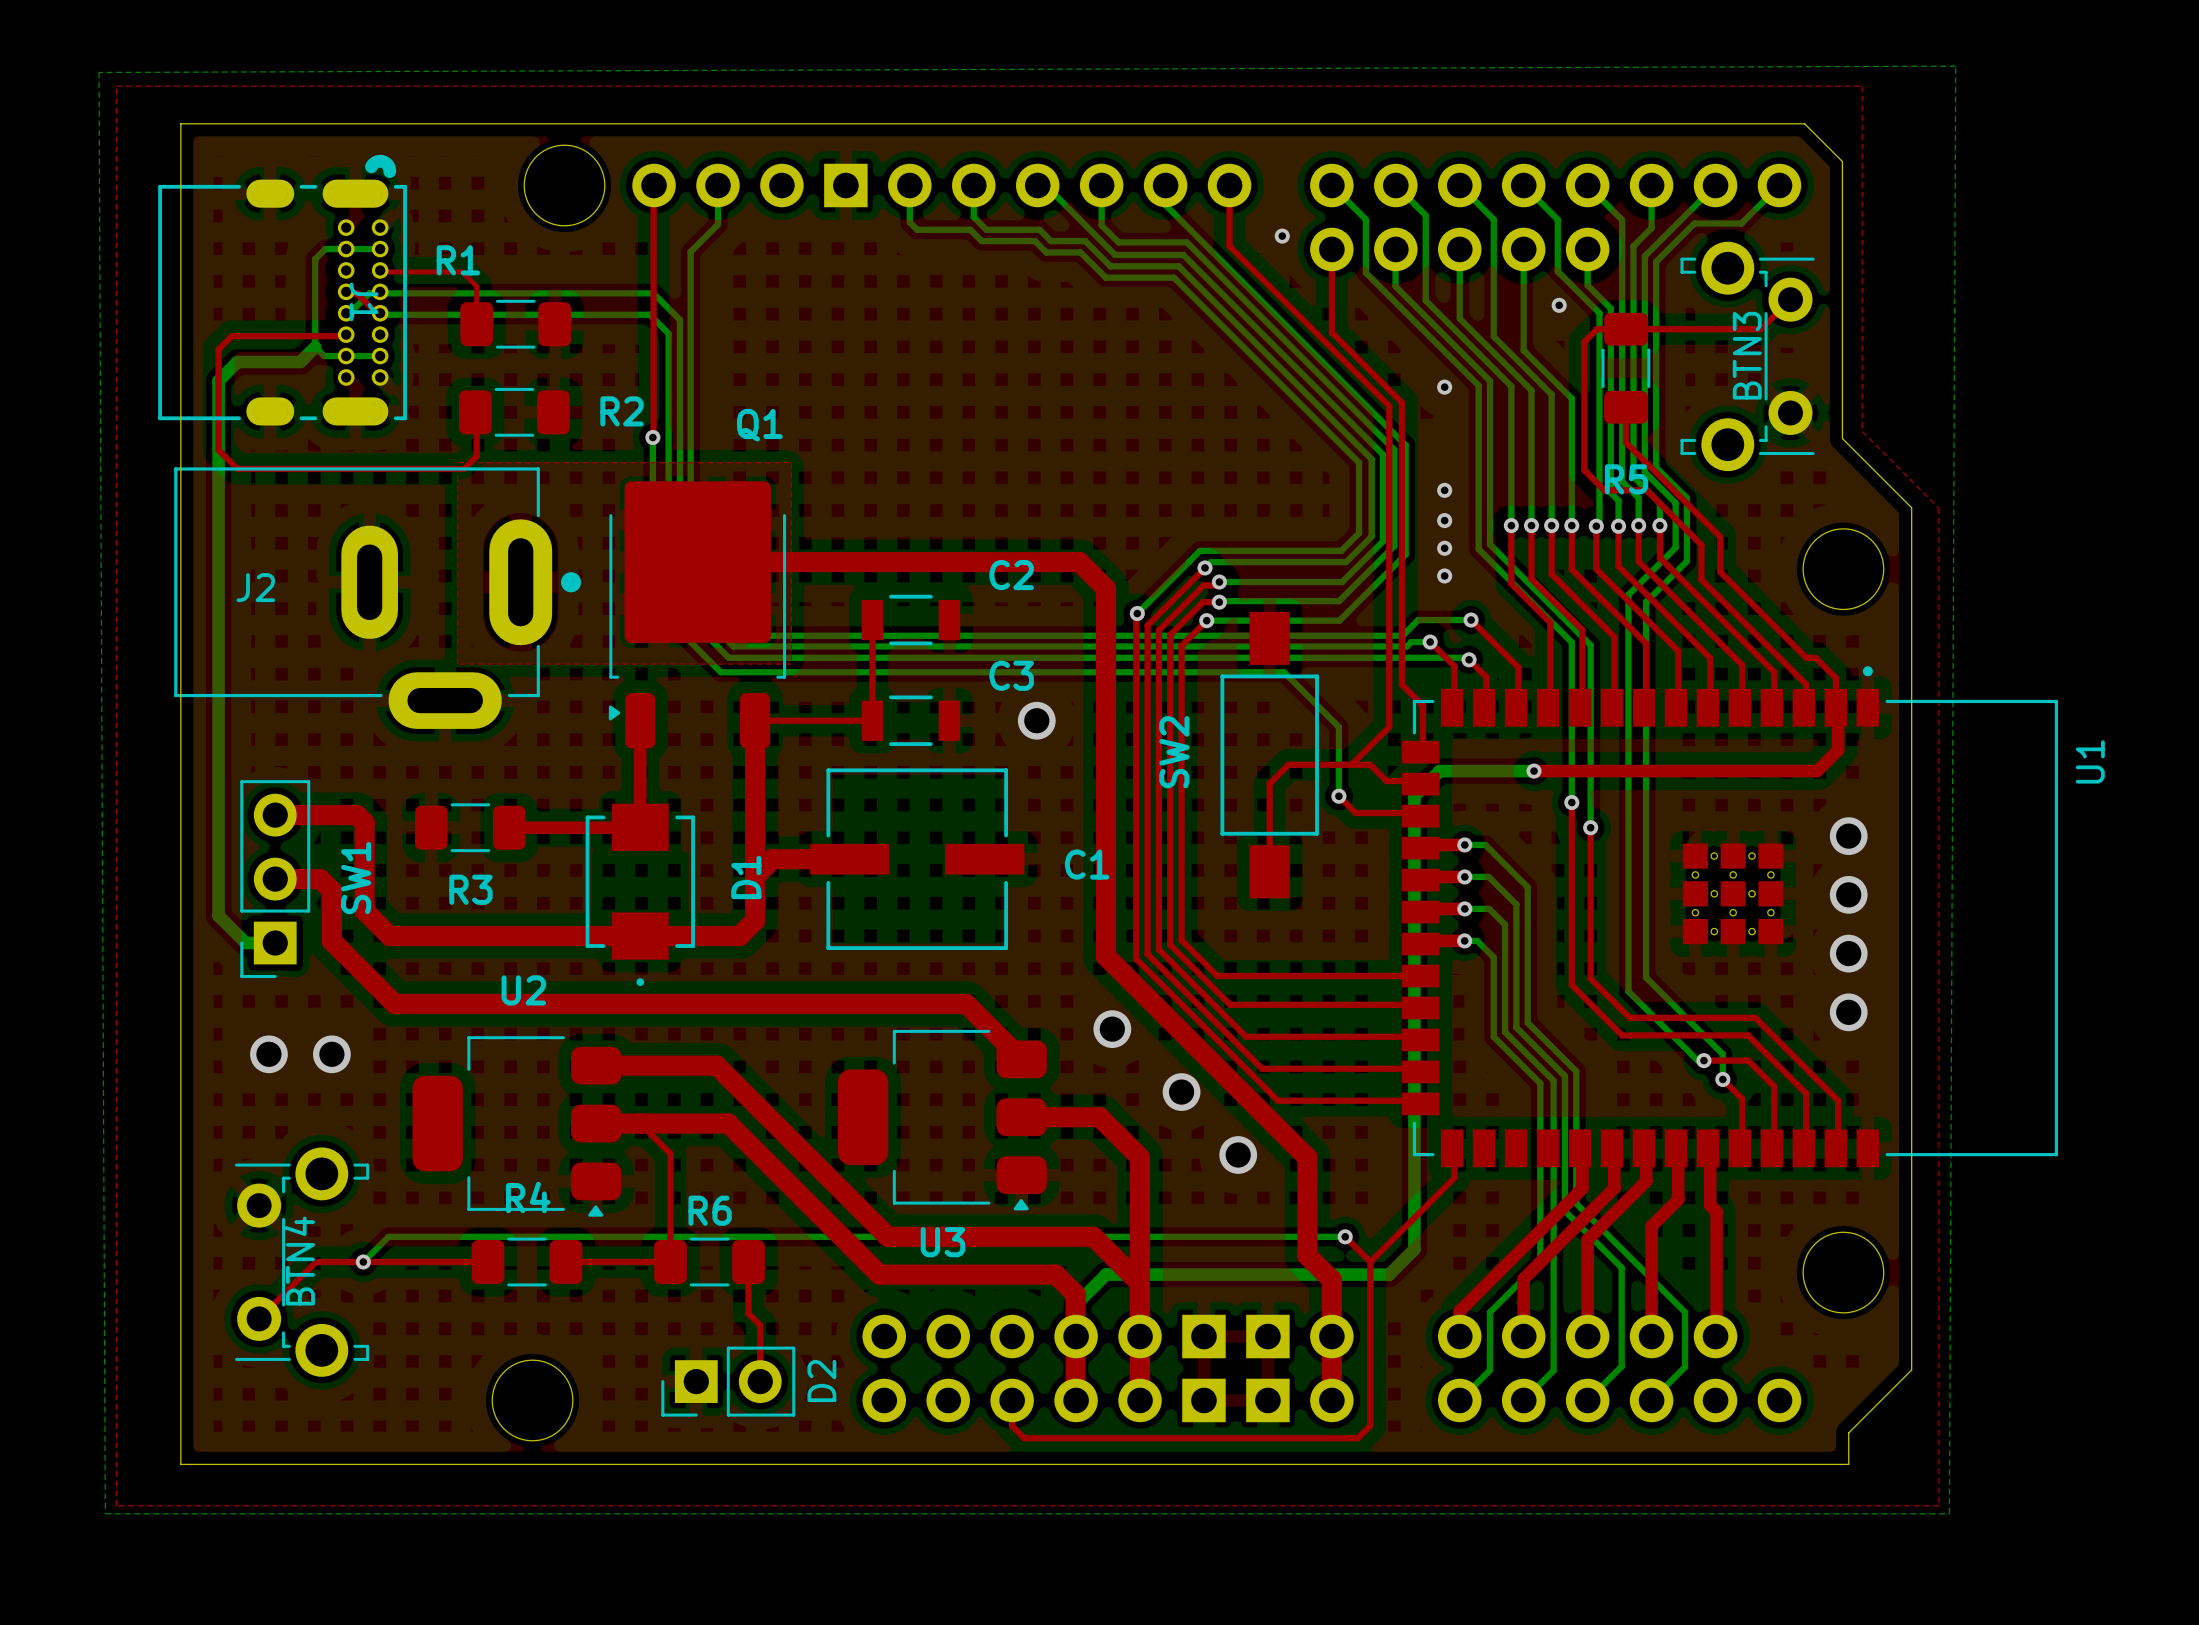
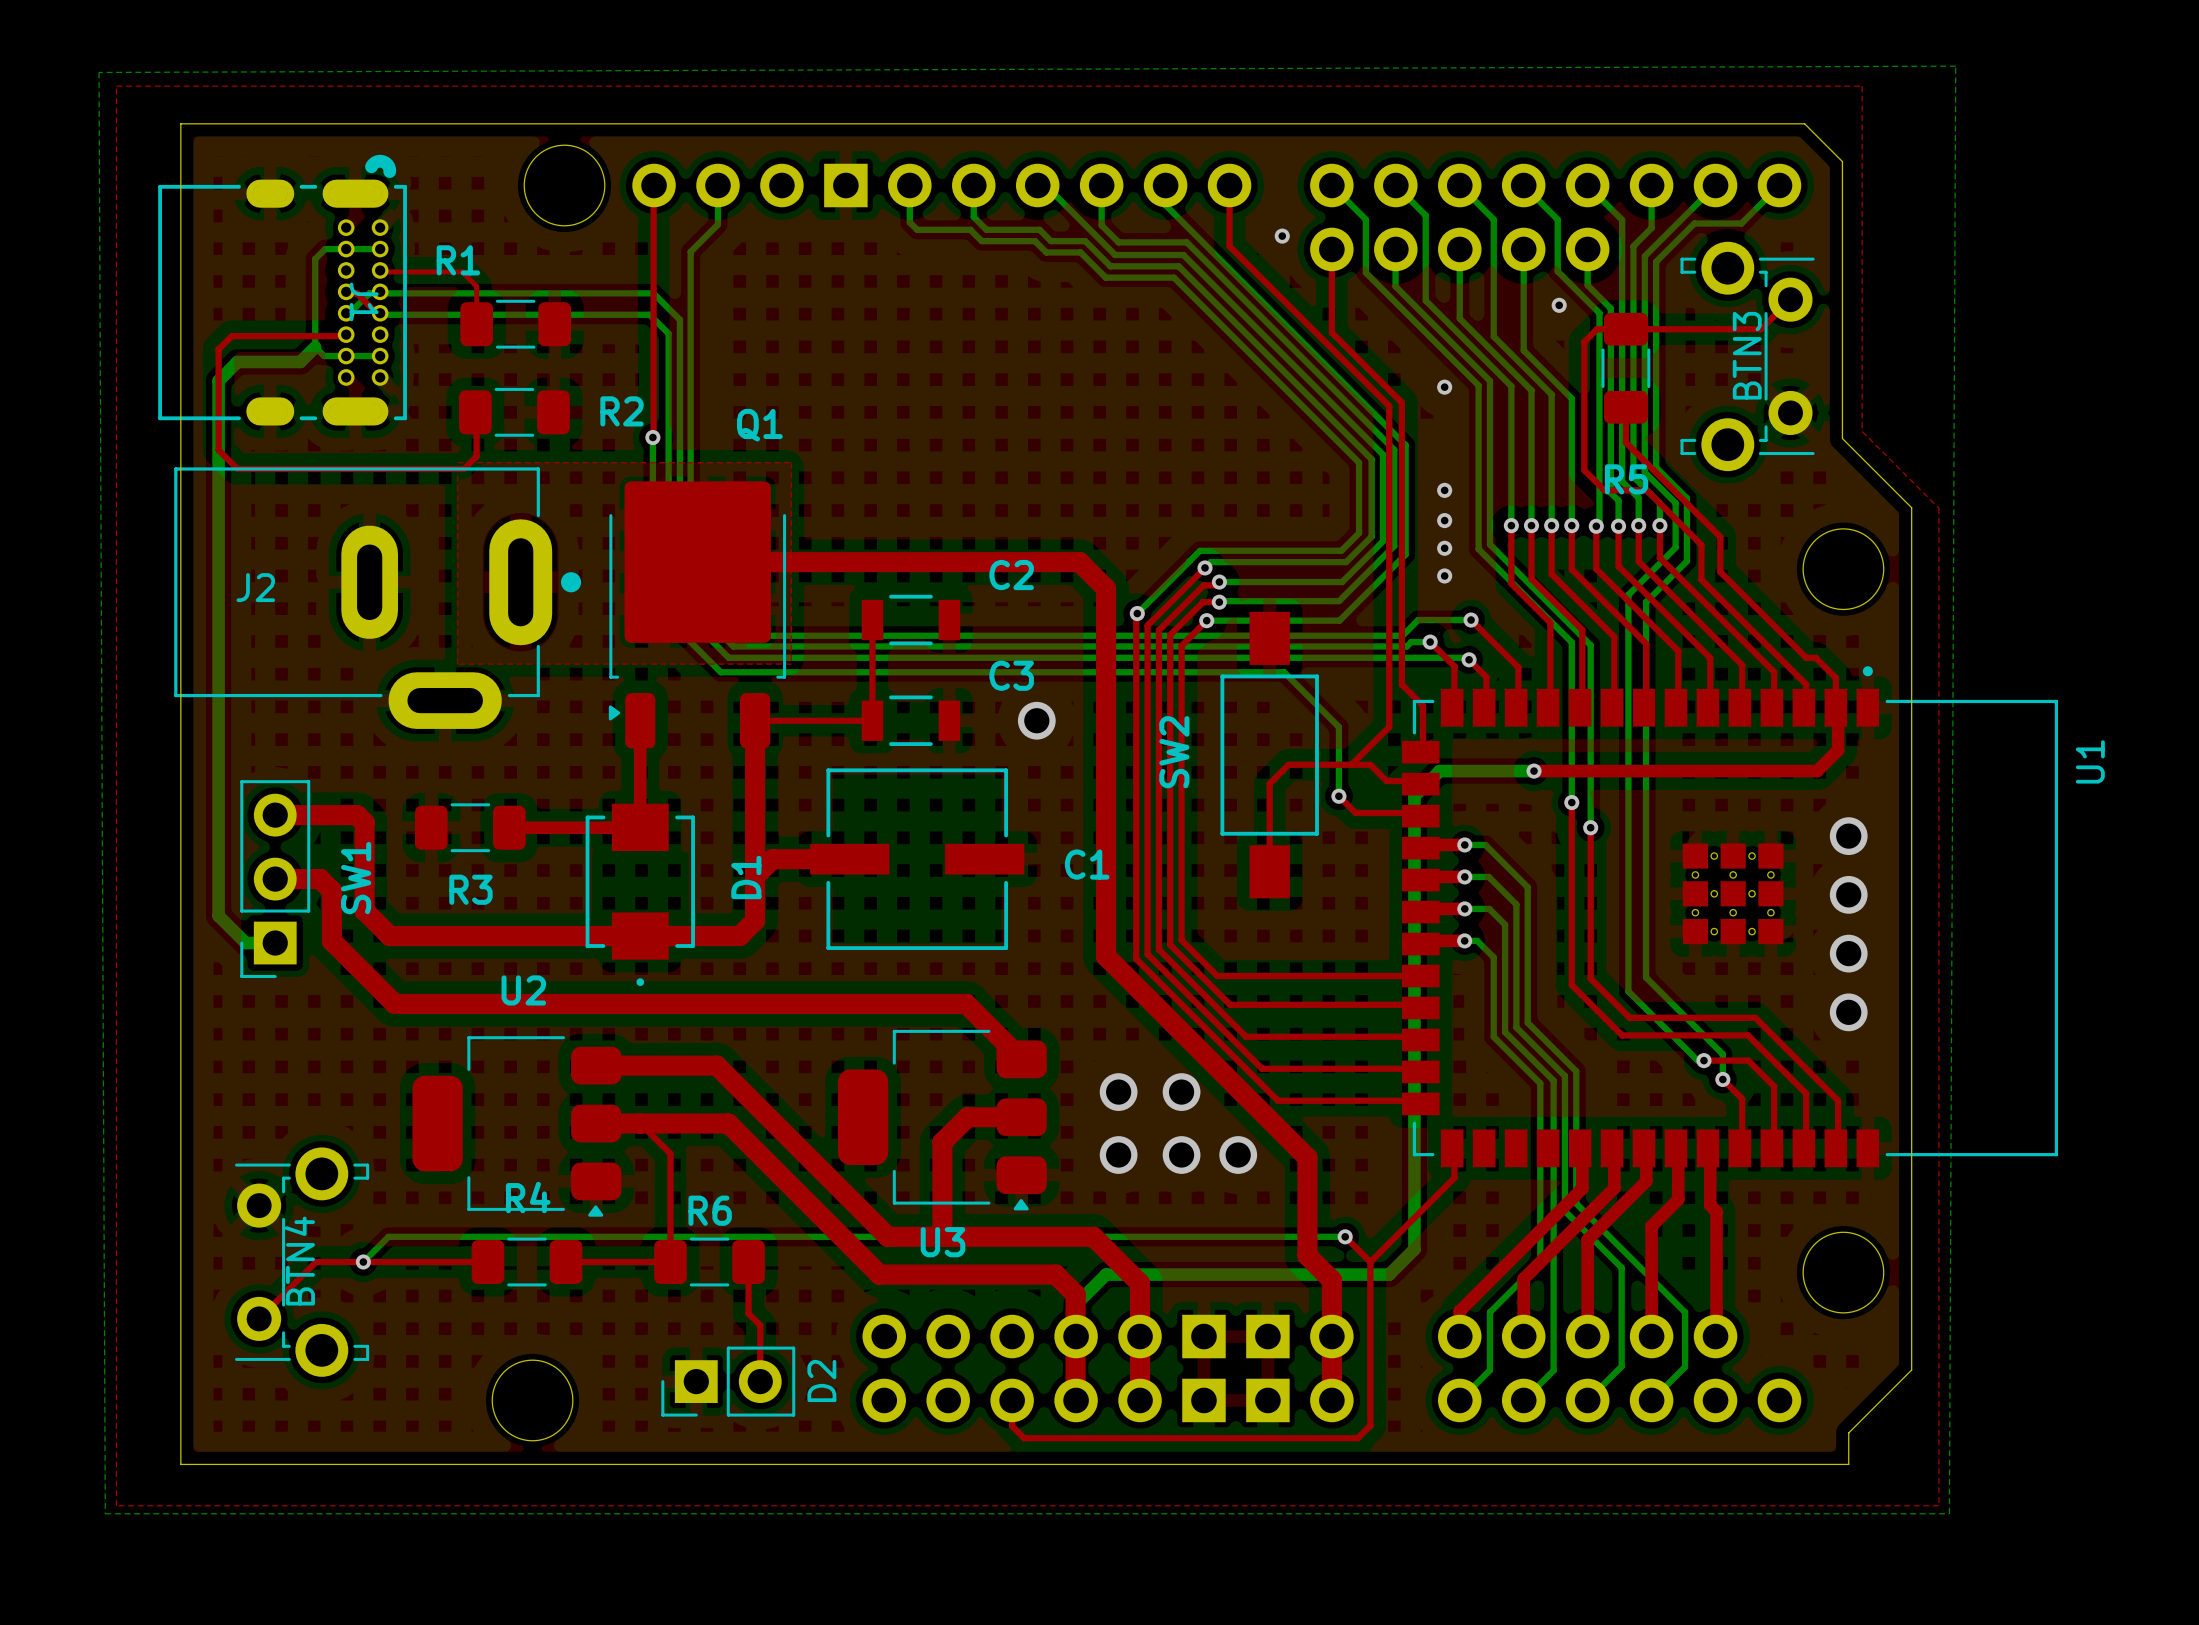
via: (1112, 1029) -> none
via: (268, 1054) -> none
via: (331, 1054) -> none
via: none -> (1118, 1092)
top track: (1021, 1117) (1099, 1117) (1140, 1157) (1140, 1283) -> (1021, 1117) (967, 1117) (942, 1142) (942, 1236)
via: none -> (1118, 1155)
via: none -> (1181, 1155)

